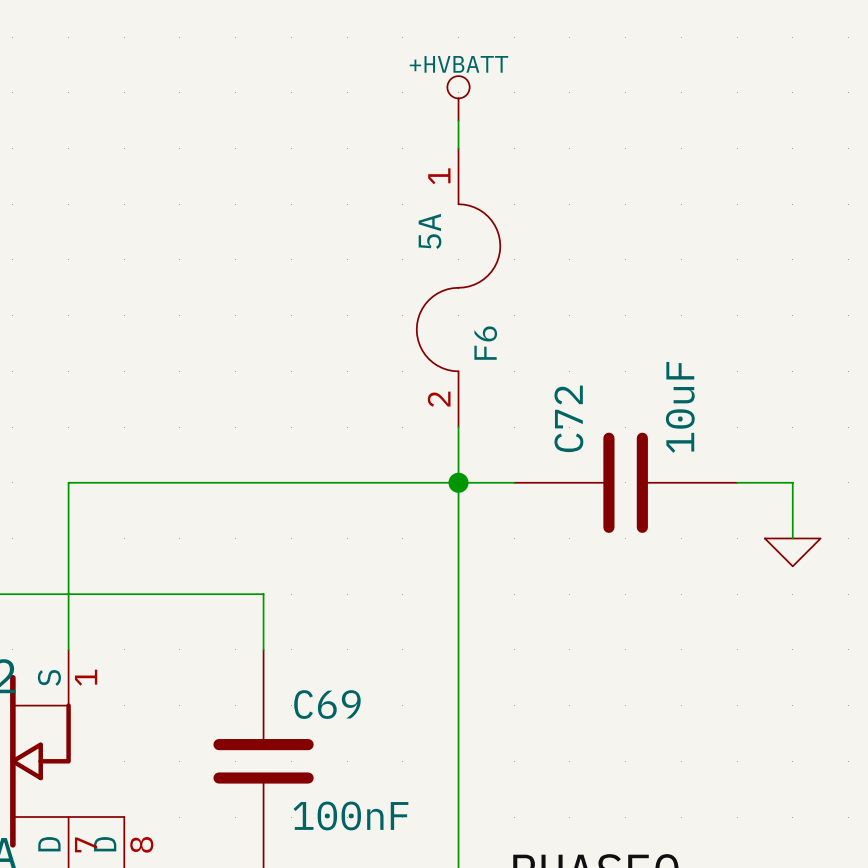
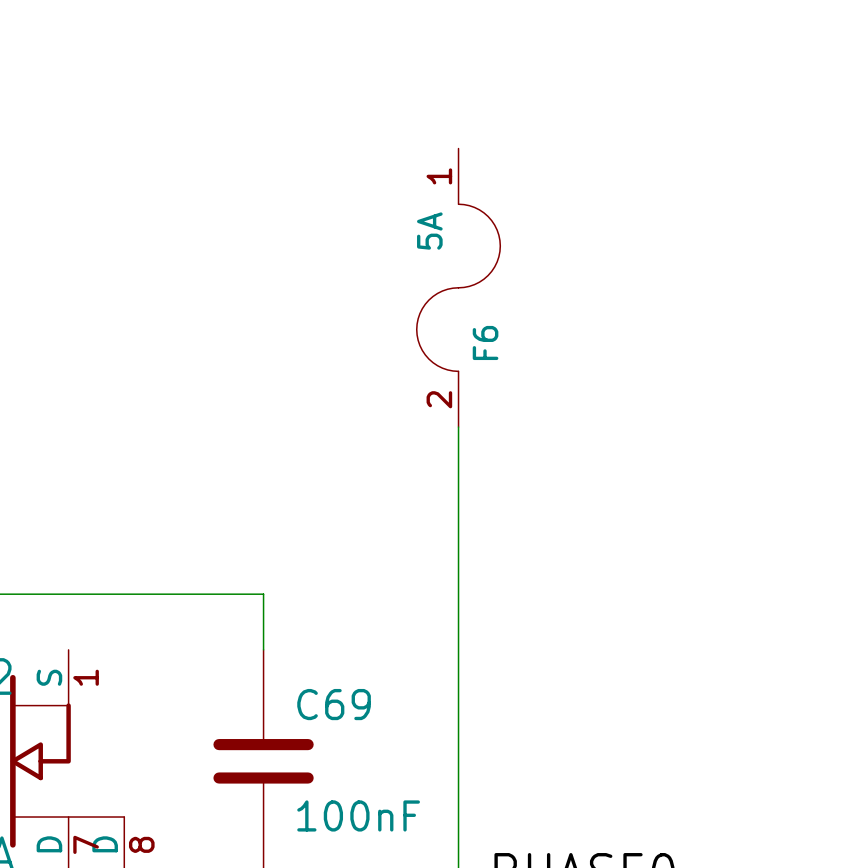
power symbol: +HVBATT (458, 98) -> none
wire: (458, 120) (458, 148) -> none
junction: (458, 482) -> none
wire: (514, 482) (68, 482) (68, 649) -> none
C72: 10uF (625, 482) -> none
wire: (737, 482) (792, 482) (792, 538) -> none
power symbol: (792, 552) -> none

